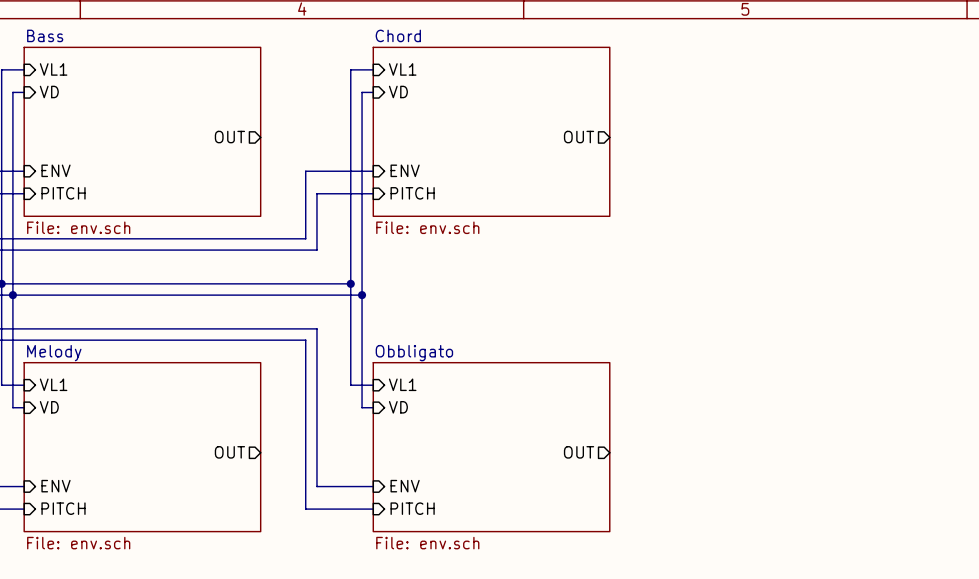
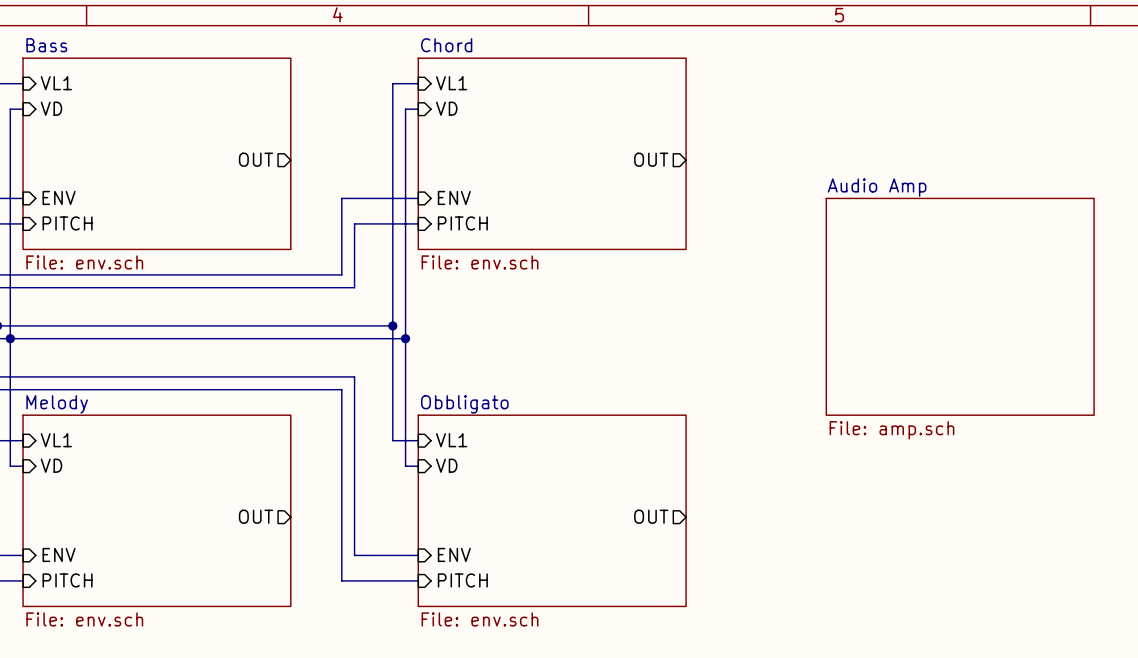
sheet Audio Amp: none -> File: amp.sch (960, 306)

